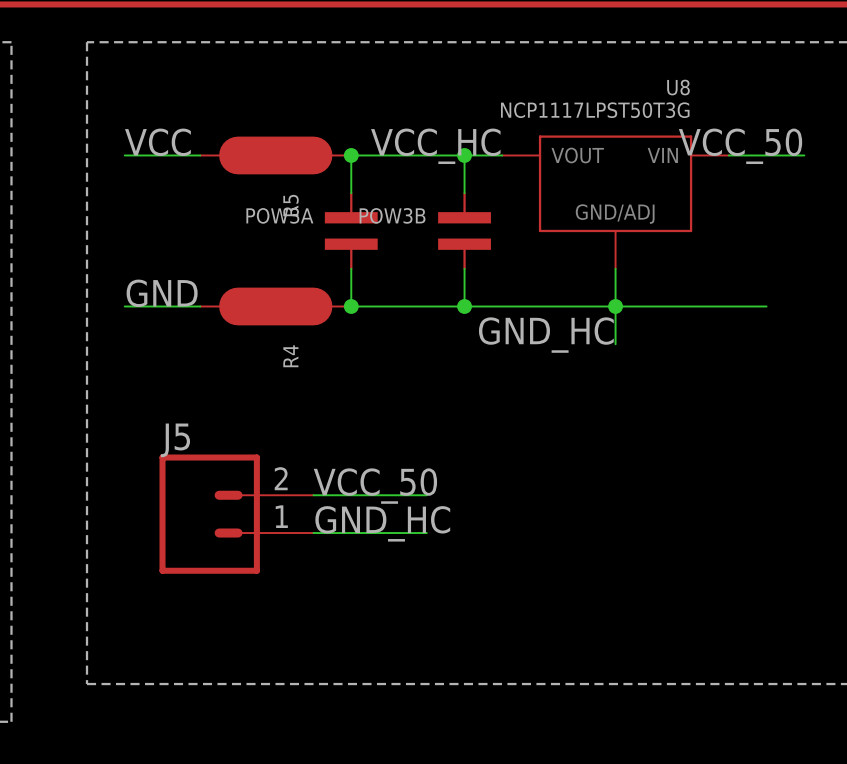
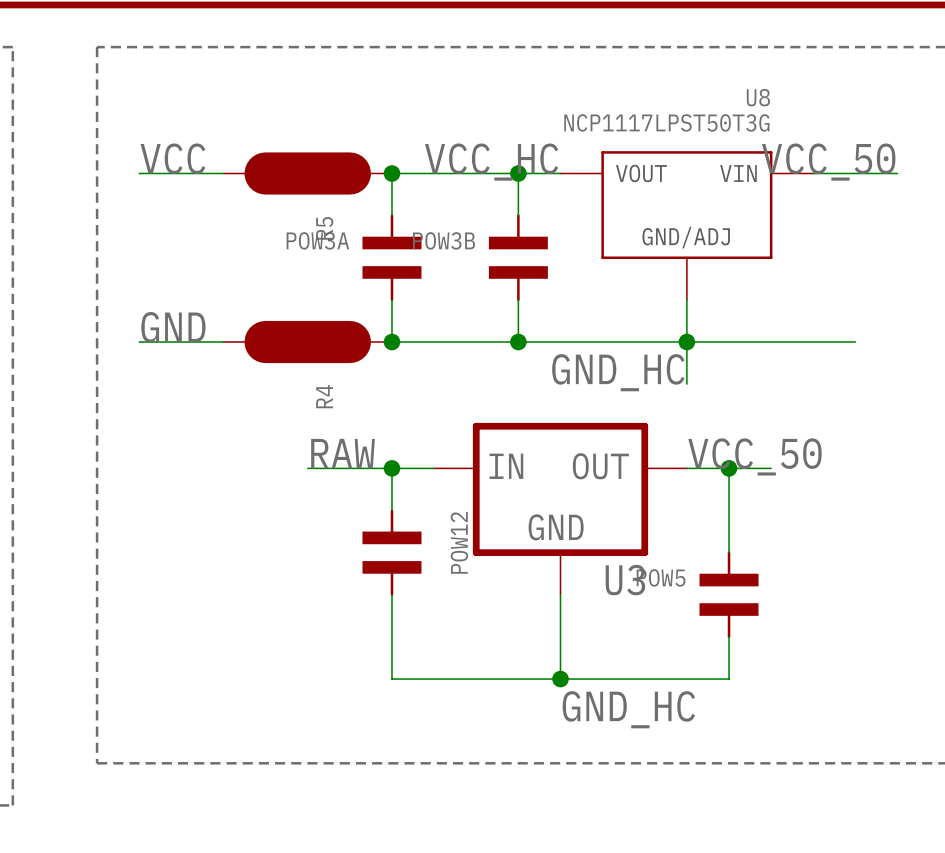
label: none -> RAW (343, 453)
wire: none -> (391, 468) (391, 510)
junction: none -> (391, 468)
wire: none -> (686, 468) (771, 468)
wire: none -> (729, 468) (729, 552)
junction: none -> (729, 468)
U3: none -> (560, 508)
label position: VCC_50 (375, 486) -> VCC_50 (754, 456)
wire: (313, 495) (426, 495) -> (307, 468) (434, 468)
POW12: none -> (391, 552)
J5: (236, 514) -> none
label position: GND_HC (382, 523) -> GND_HC (628, 709)
wire: (313, 533) (426, 533) -> none
wire: none -> (391, 594) (391, 679) (729, 679) (729, 636)
wire: none -> (560, 594) (560, 679)
POW5: none -> (729, 594)
junction: none -> (560, 679)

